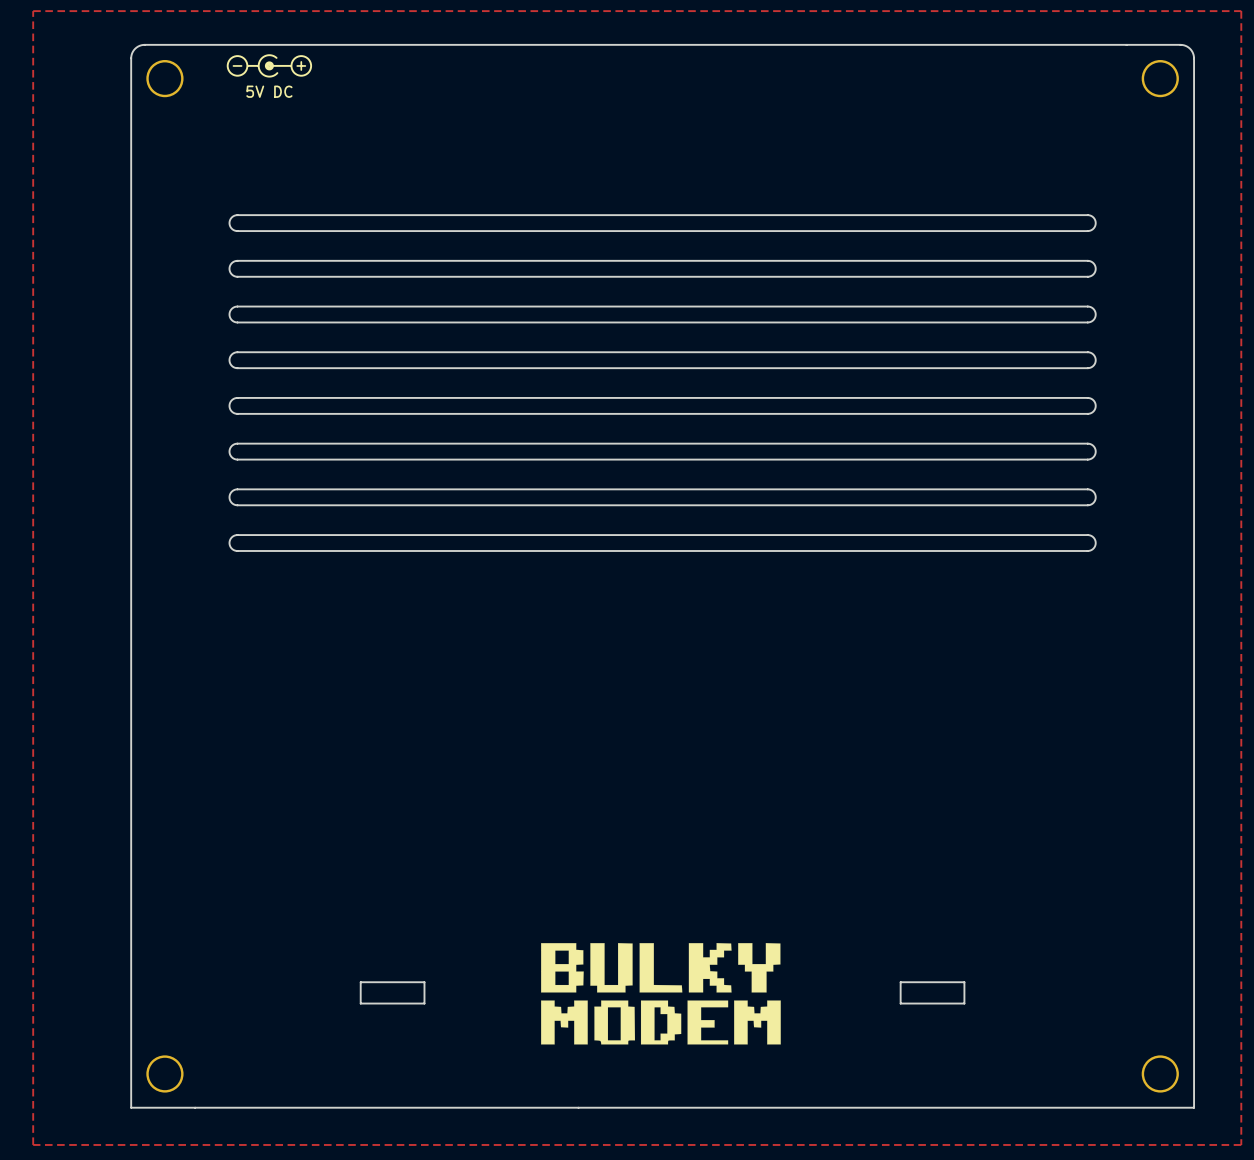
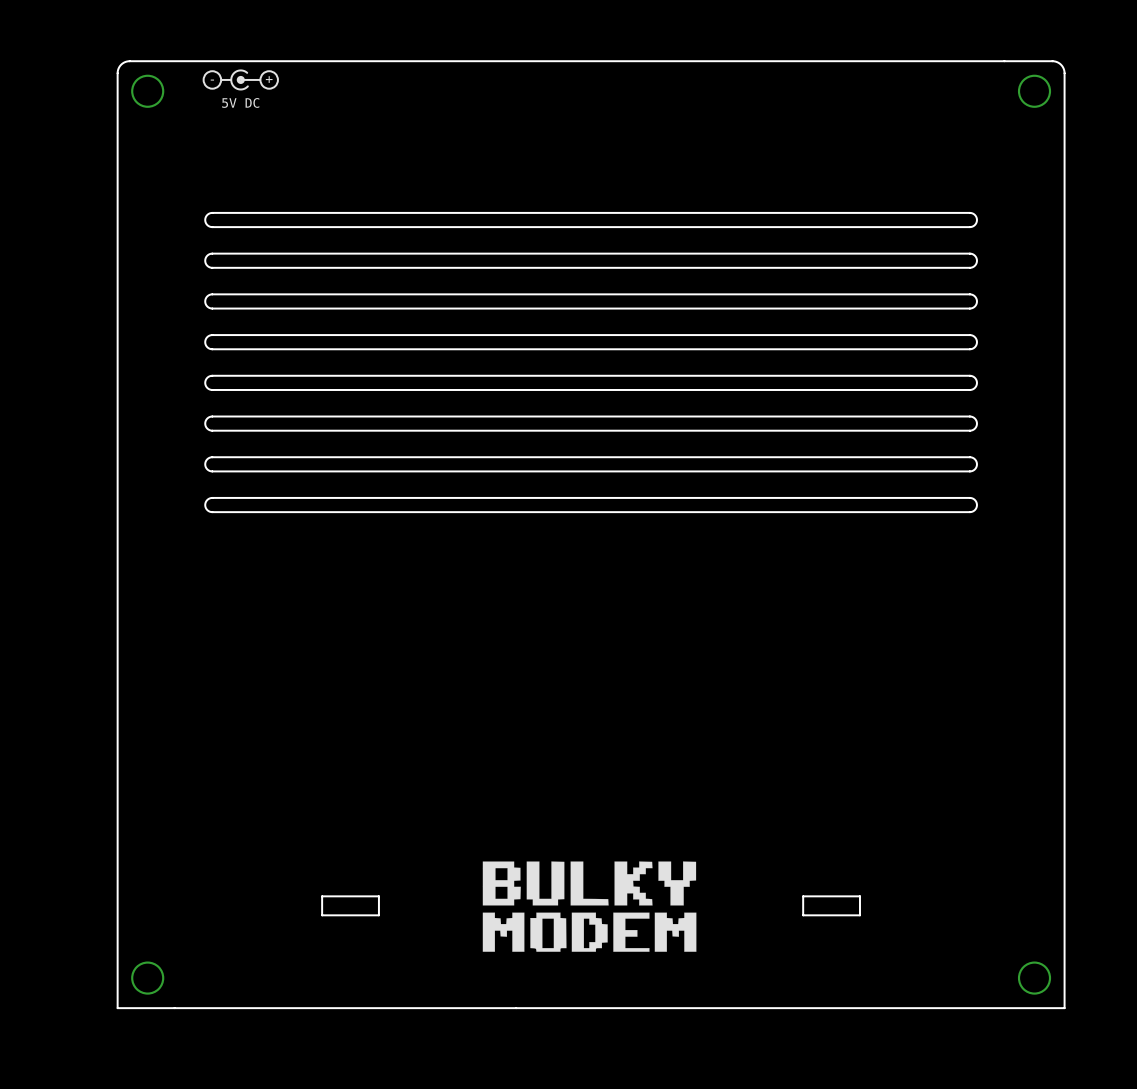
zone outline: (33, 11) (33, 1144) (1241, 1144) (1241, 11) (33, 11) -> none

